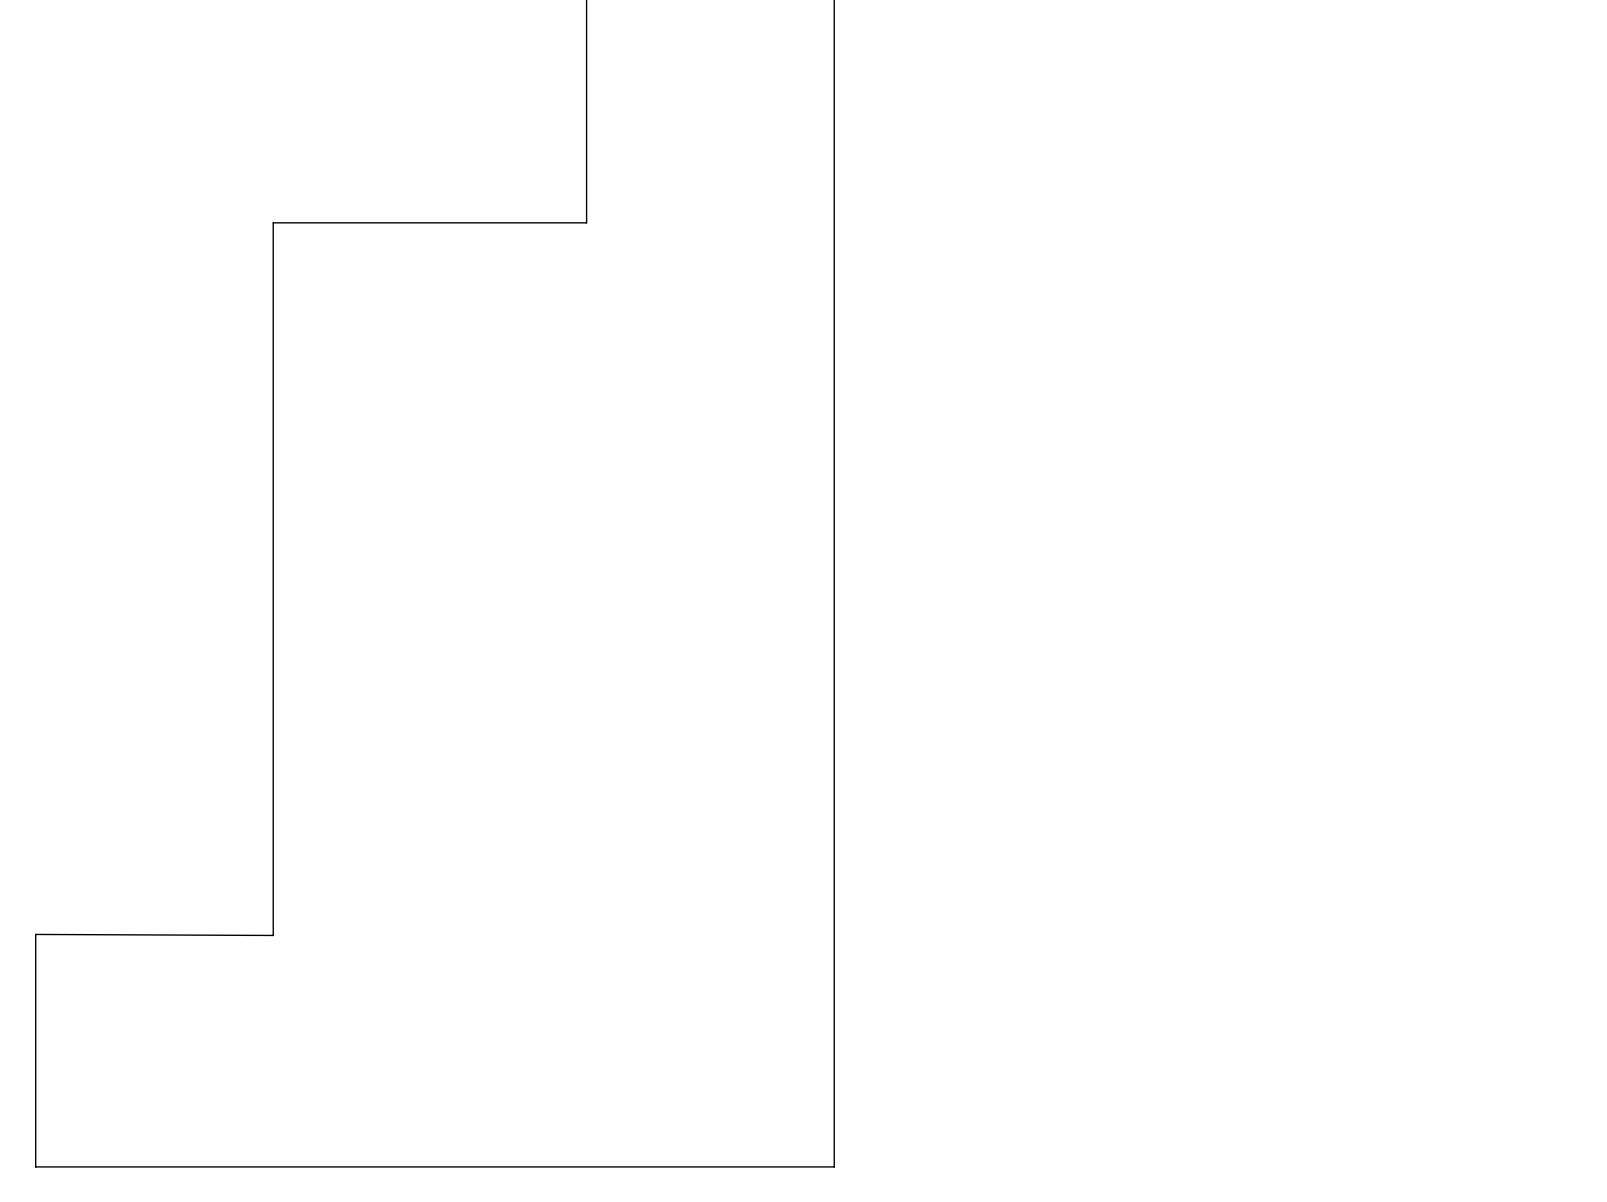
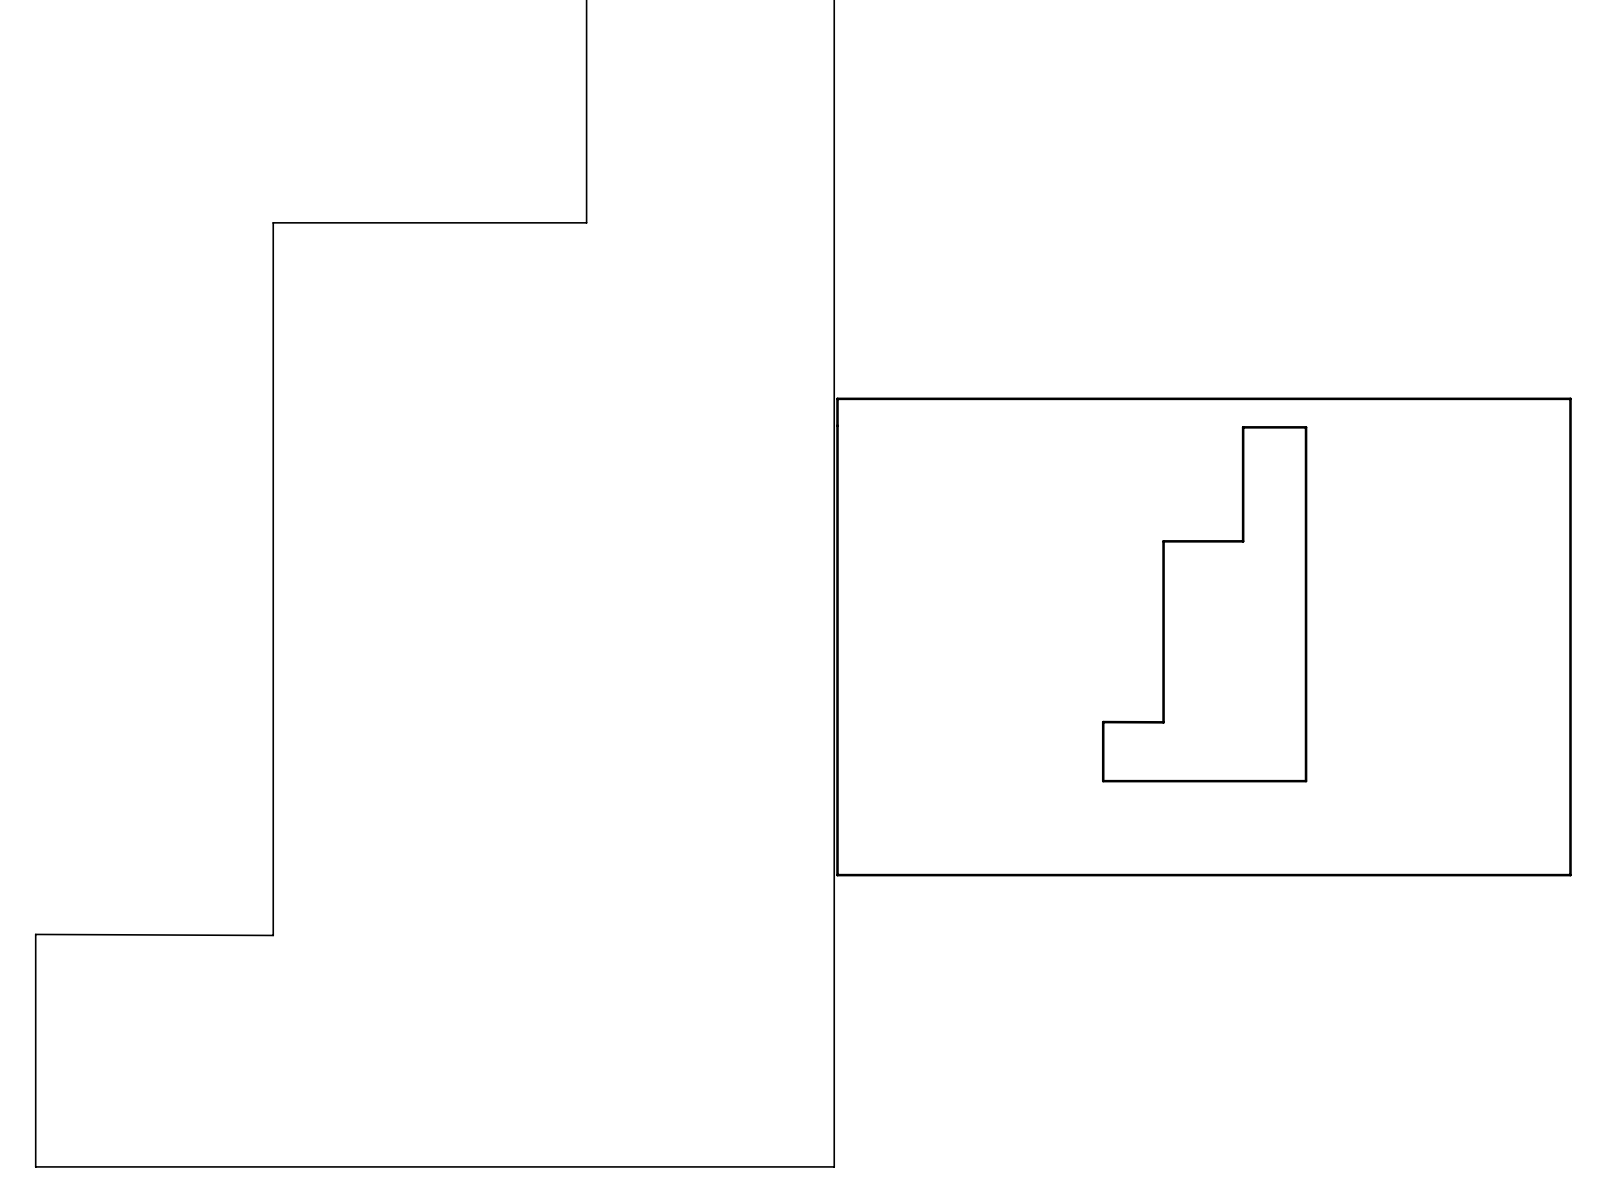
board edge: none -> (837, 398) (1570, 398) (1570, 875) (837, 875) (837, 398)
board edge: none -> (1243, 427) (1243, 541) (1163, 541) (1163, 722) (1103, 722) (1103, 781) (1306, 781) (1306, 427) (1243, 427)

